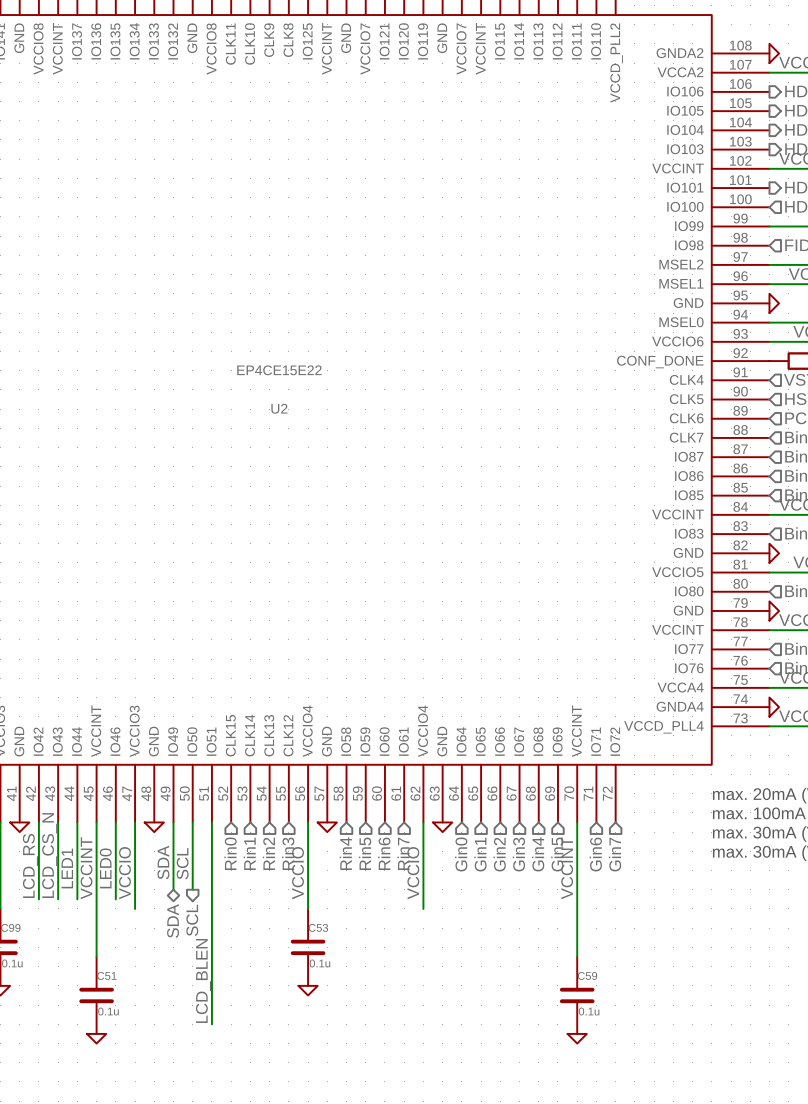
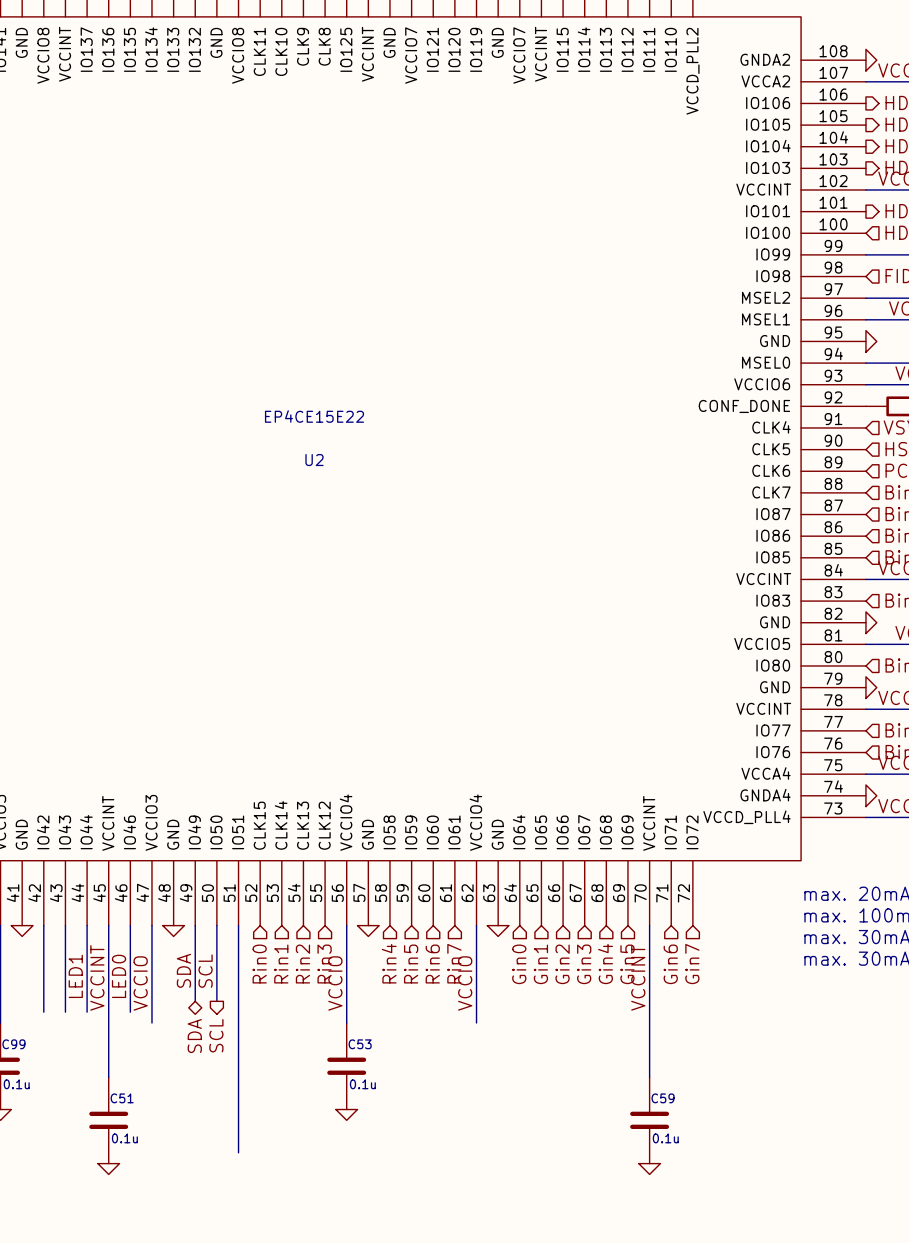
label: LCD_CS_N (49, 855) -> none
label: LCD_RS (30, 865) -> none
label: LCD_BLEN (203, 980) -> none

